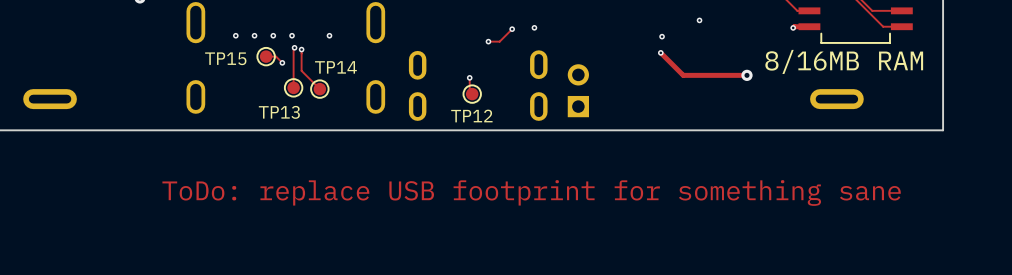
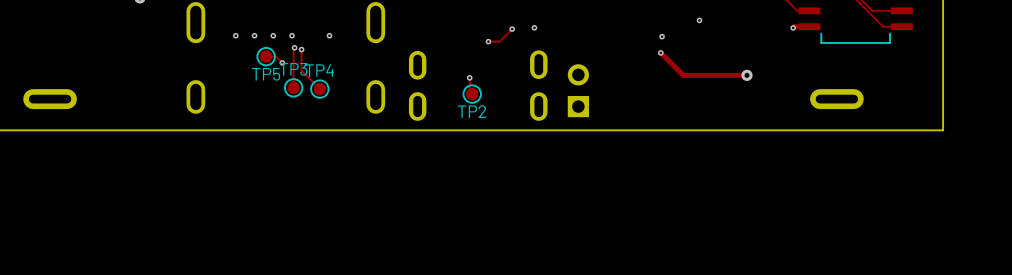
TP15 name: TP15 (225, 58) -> TP5 (266, 74)
text: 8/16MB RAM (844, 61) -> none
TP14 name: TP14 (335, 67) -> TP4 (319, 70)
TP13 name: TP13 (279, 112) -> TP3 (293, 69)
TP12 name: TP12 (471, 116) -> TP2 (472, 111)
text: ToDo: replace USB footprint for something sane (531, 192) -> none

